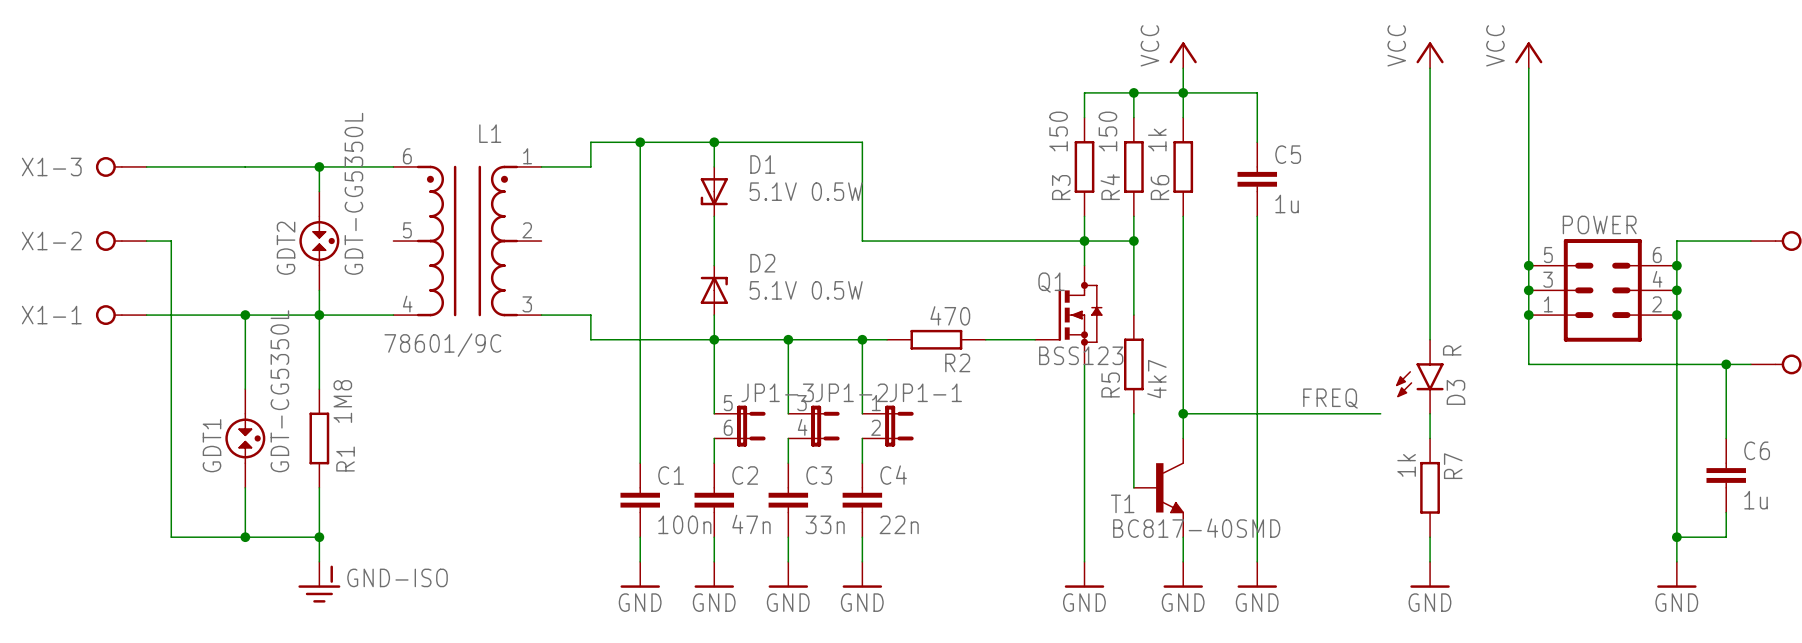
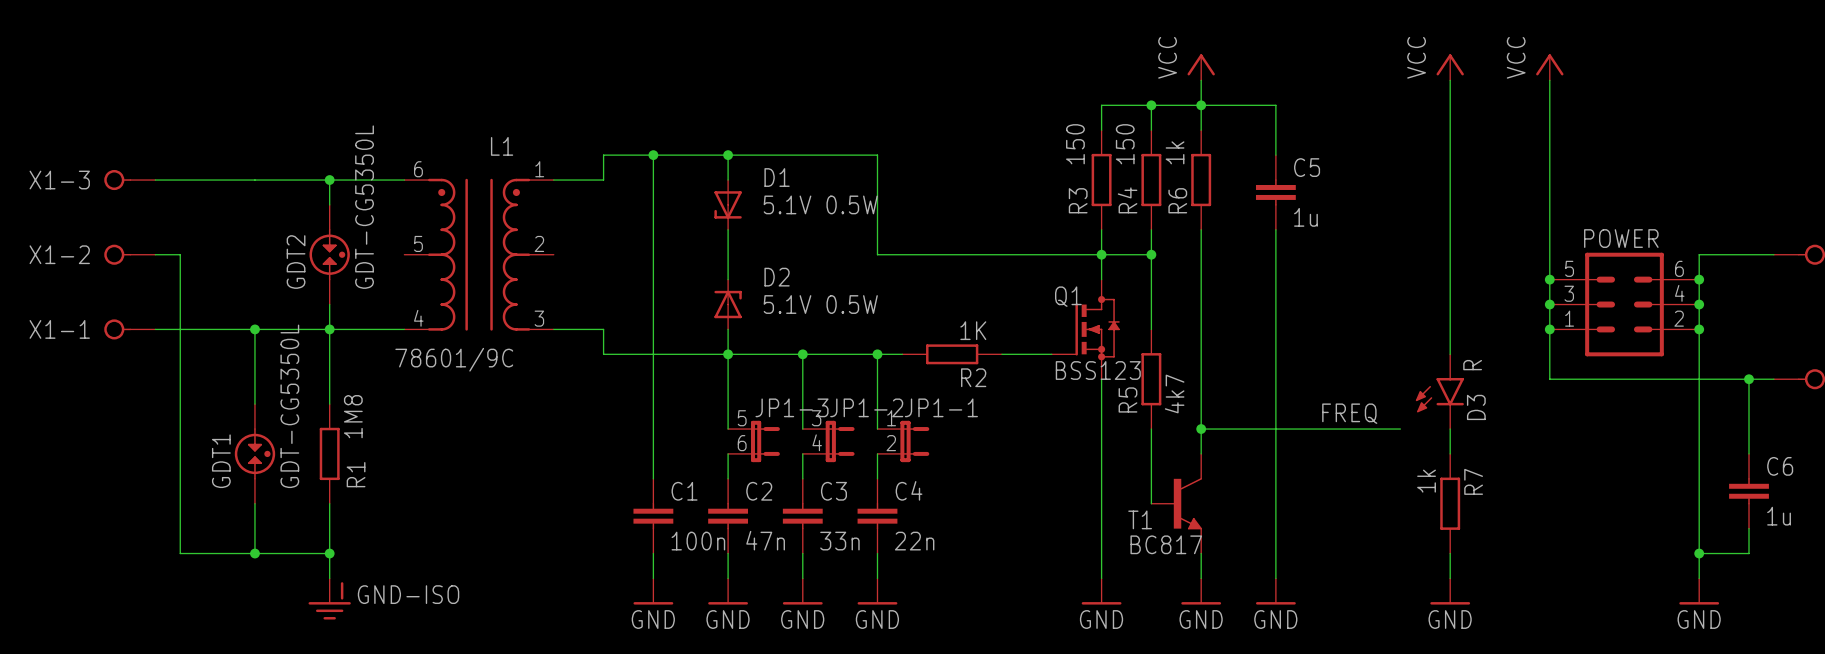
R2 value: 470 (950, 315) -> 1K (973, 330)
T1 value: BC817-40SMD (1196, 528) -> BC817 (1166, 544)

